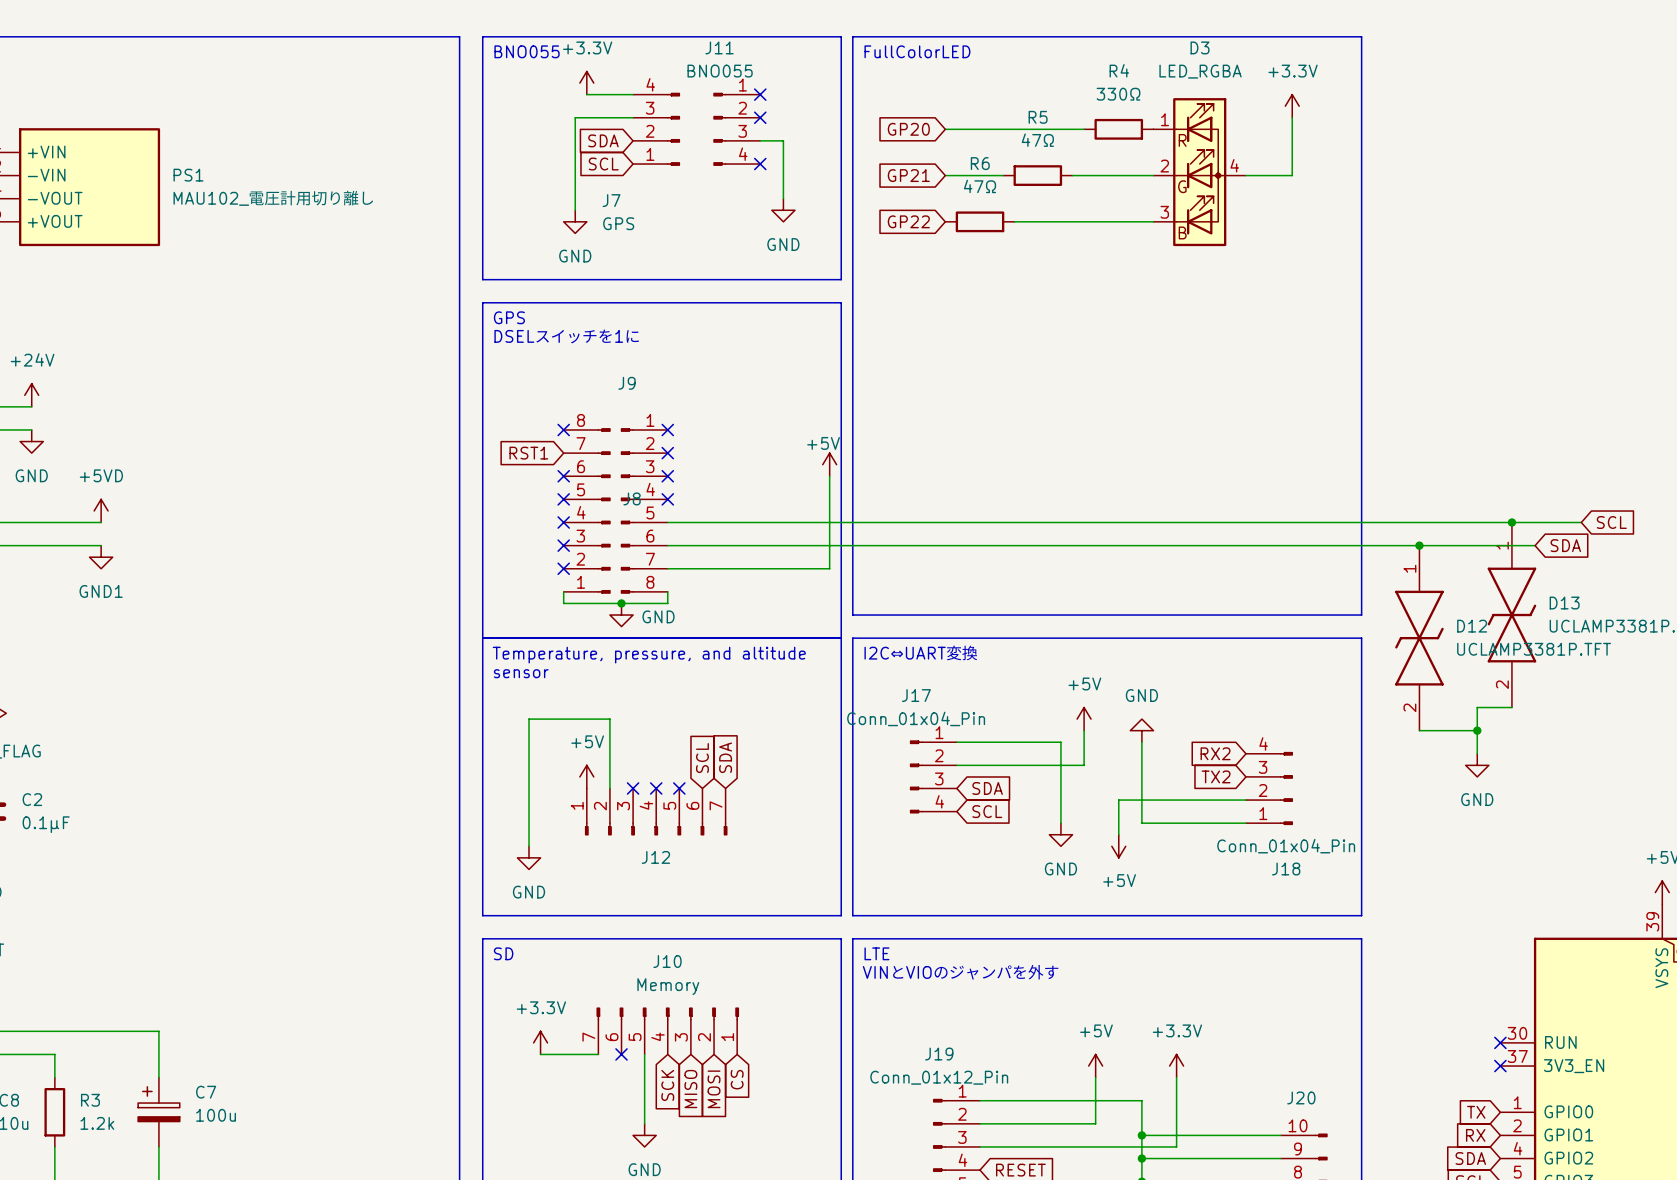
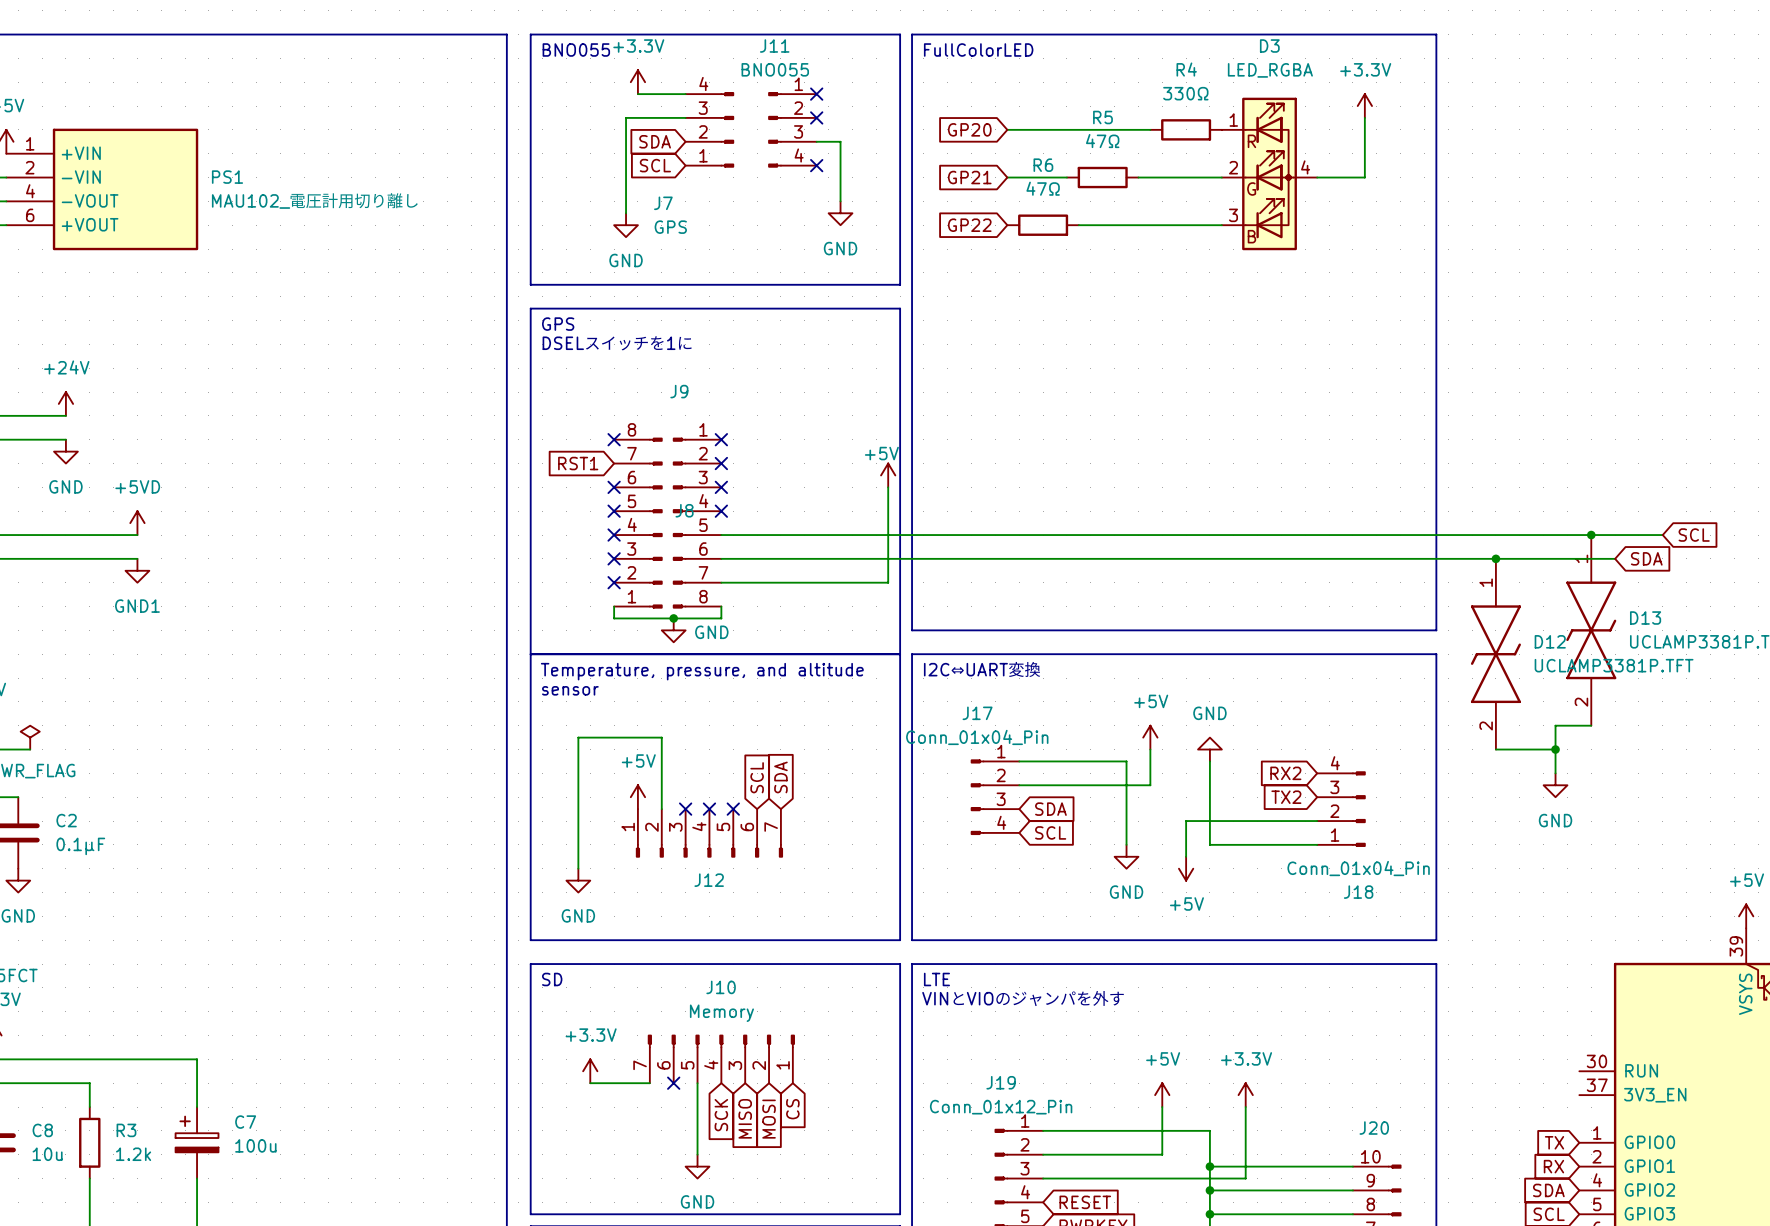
no-connect mark: (1500, 1042) -> none
no-connect mark: (1500, 1066) -> none

